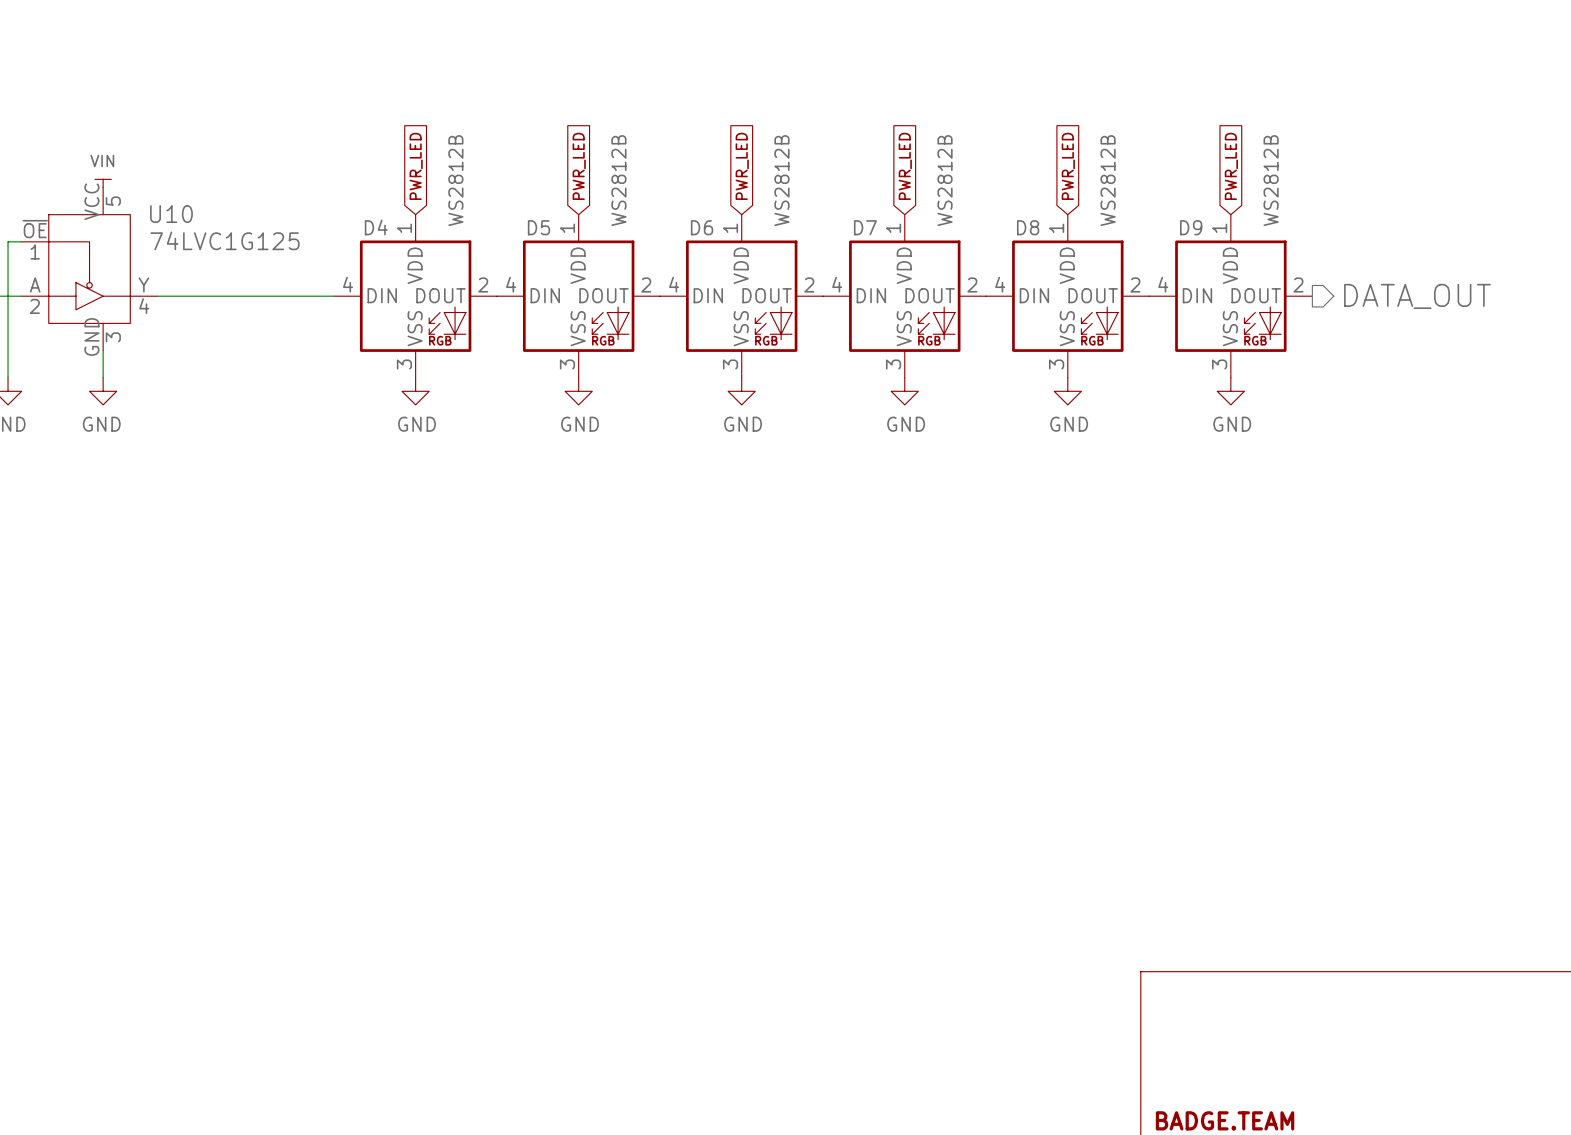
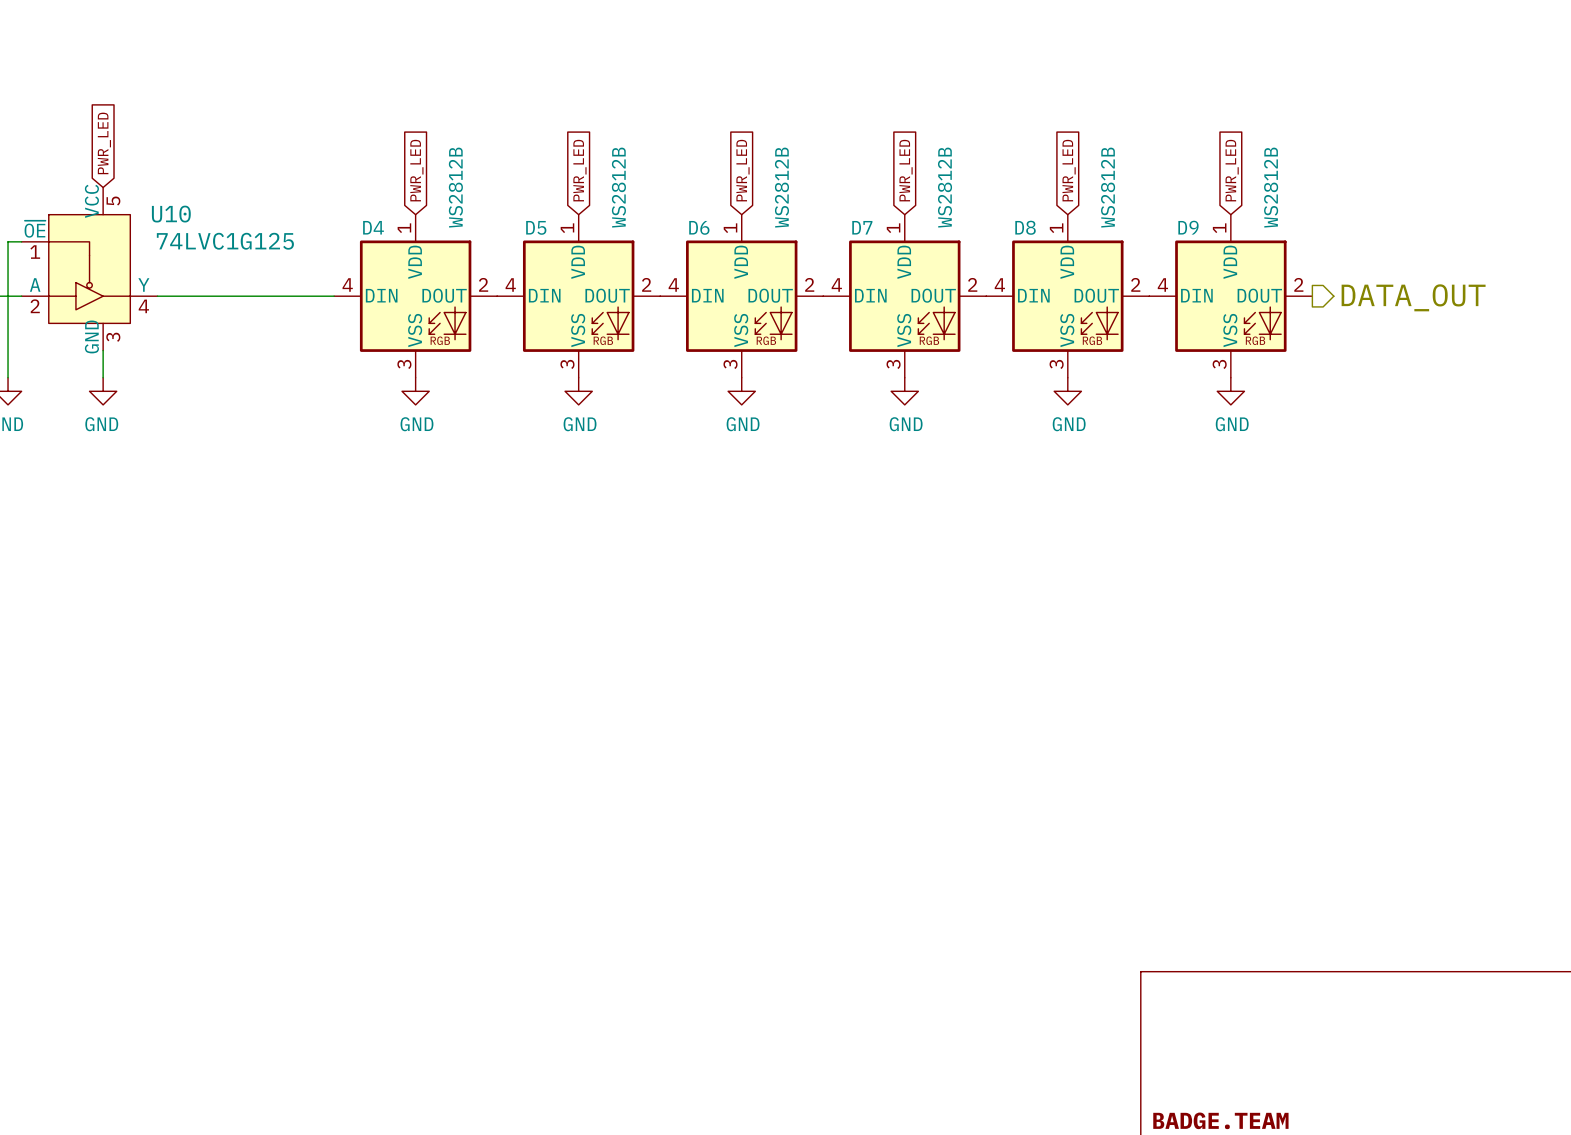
global label: none -> PWR_LED (104, 143)
power symbol: VIN (103, 183) -> none

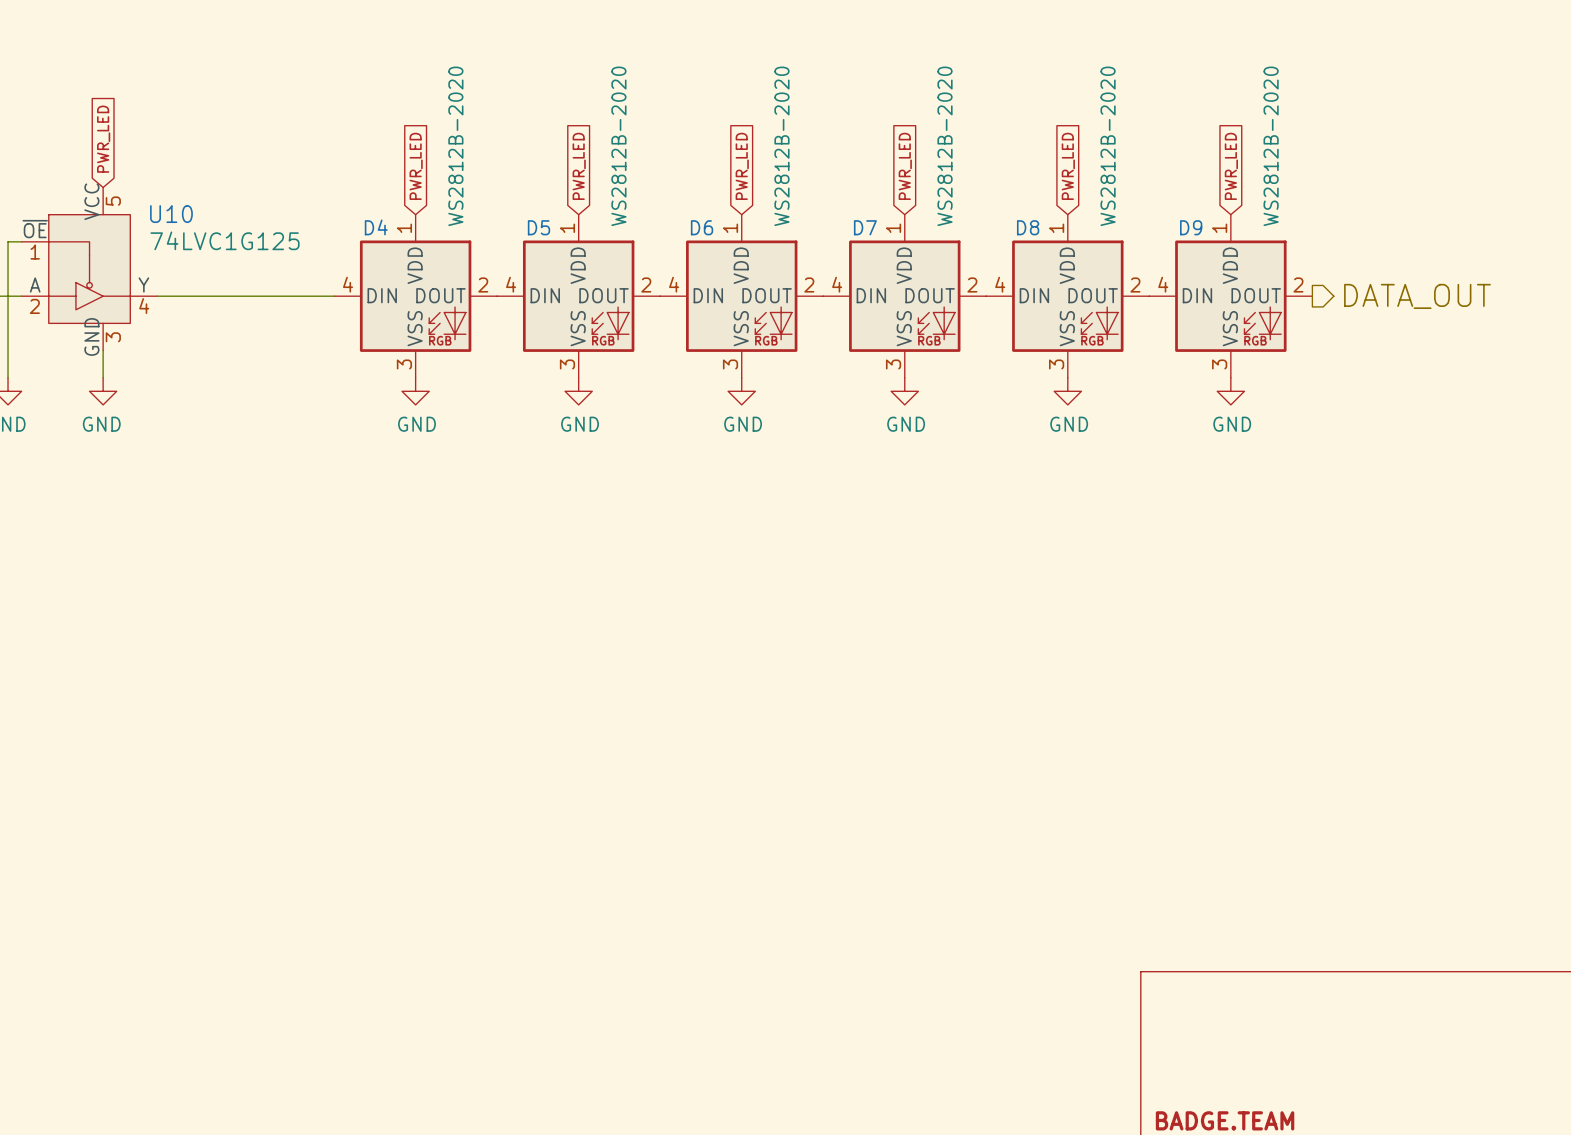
D4 value: WS2812B (455, 187) -> WS2812B-2020 (455, 146)
D5 value: WS2812B (618, 187) -> WS2812B-2020 (618, 146)
D6 value: WS2812B (781, 187) -> WS2812B-2020 (781, 146)
D7 value: WS2812B (945, 187) -> WS2812B-2020 (945, 146)
D8 value: WS2812B (1108, 187) -> WS2812B-2020 (1108, 146)
D9 value: WS2812B (1271, 187) -> WS2812B-2020 (1271, 146)

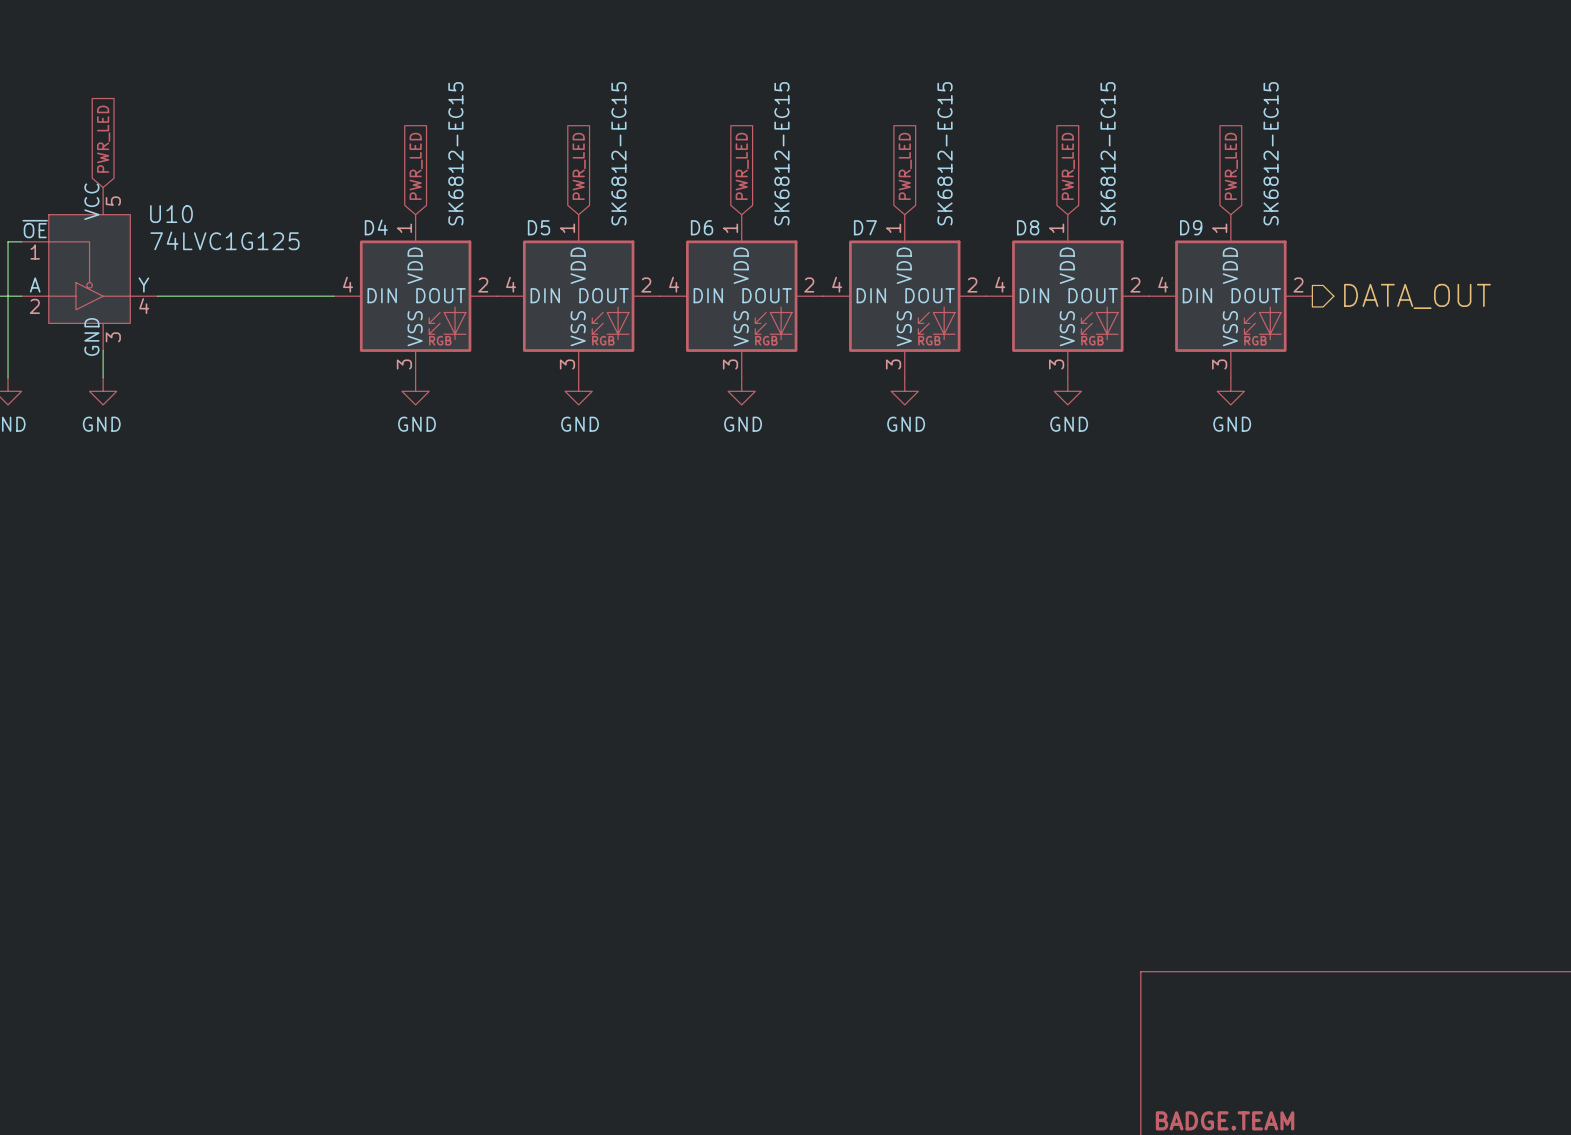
D4 value: WS2812B-2020 (455, 146) -> SK6812-EC15 (455, 153)
D5 value: WS2812B-2020 (618, 146) -> SK6812-EC15 (618, 153)
D6 value: WS2812B-2020 (781, 146) -> SK6812-EC15 (781, 153)
D7 value: WS2812B-2020 (945, 146) -> SK6812-EC15 (945, 153)
D8 value: WS2812B-2020 (1108, 146) -> SK6812-EC15 (1108, 153)
D9 value: WS2812B-2020 (1271, 146) -> SK6812-EC15 (1271, 153)

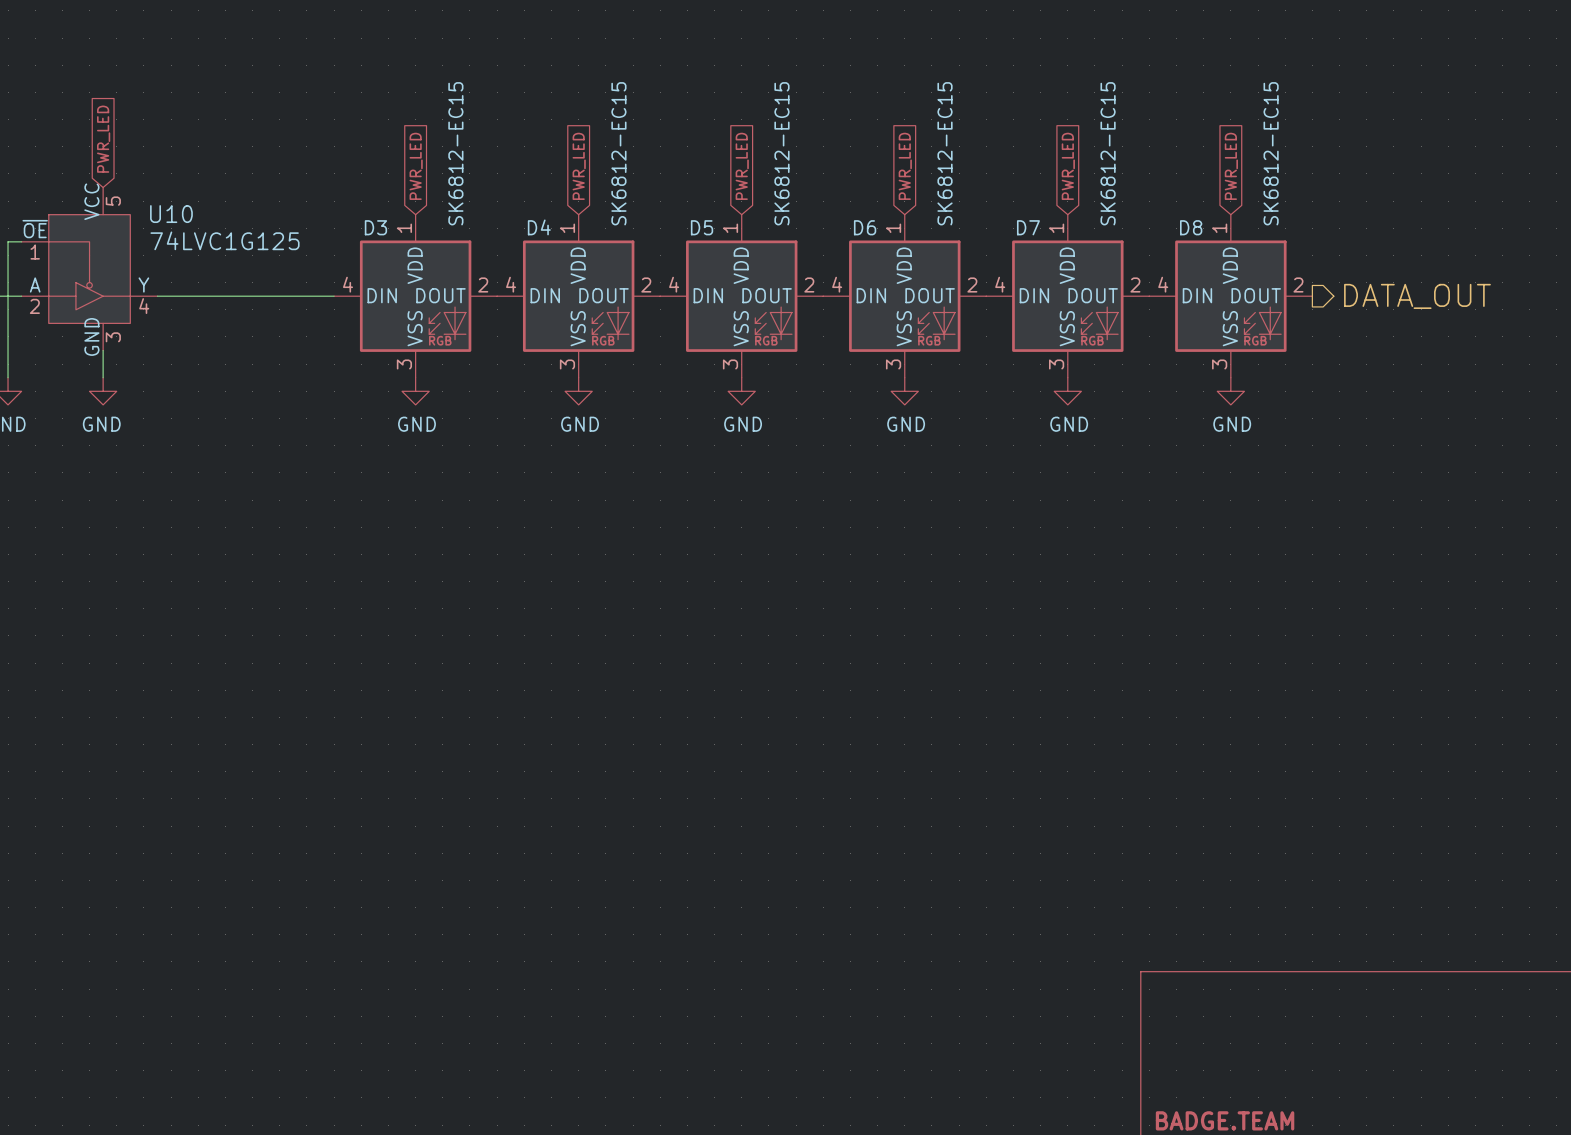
D4 name: D4 (376, 227) -> D3 (375, 227)
D5 name: D5 (538, 227) -> D4 (539, 227)
D6 name: D6 (702, 227) -> D5 (702, 227)
D7 name: D7 (865, 227) -> D6 (865, 227)
D8 name: D8 (1028, 227) -> D7 (1028, 227)
D9 name: D9 (1191, 227) -> D8 (1191, 227)

